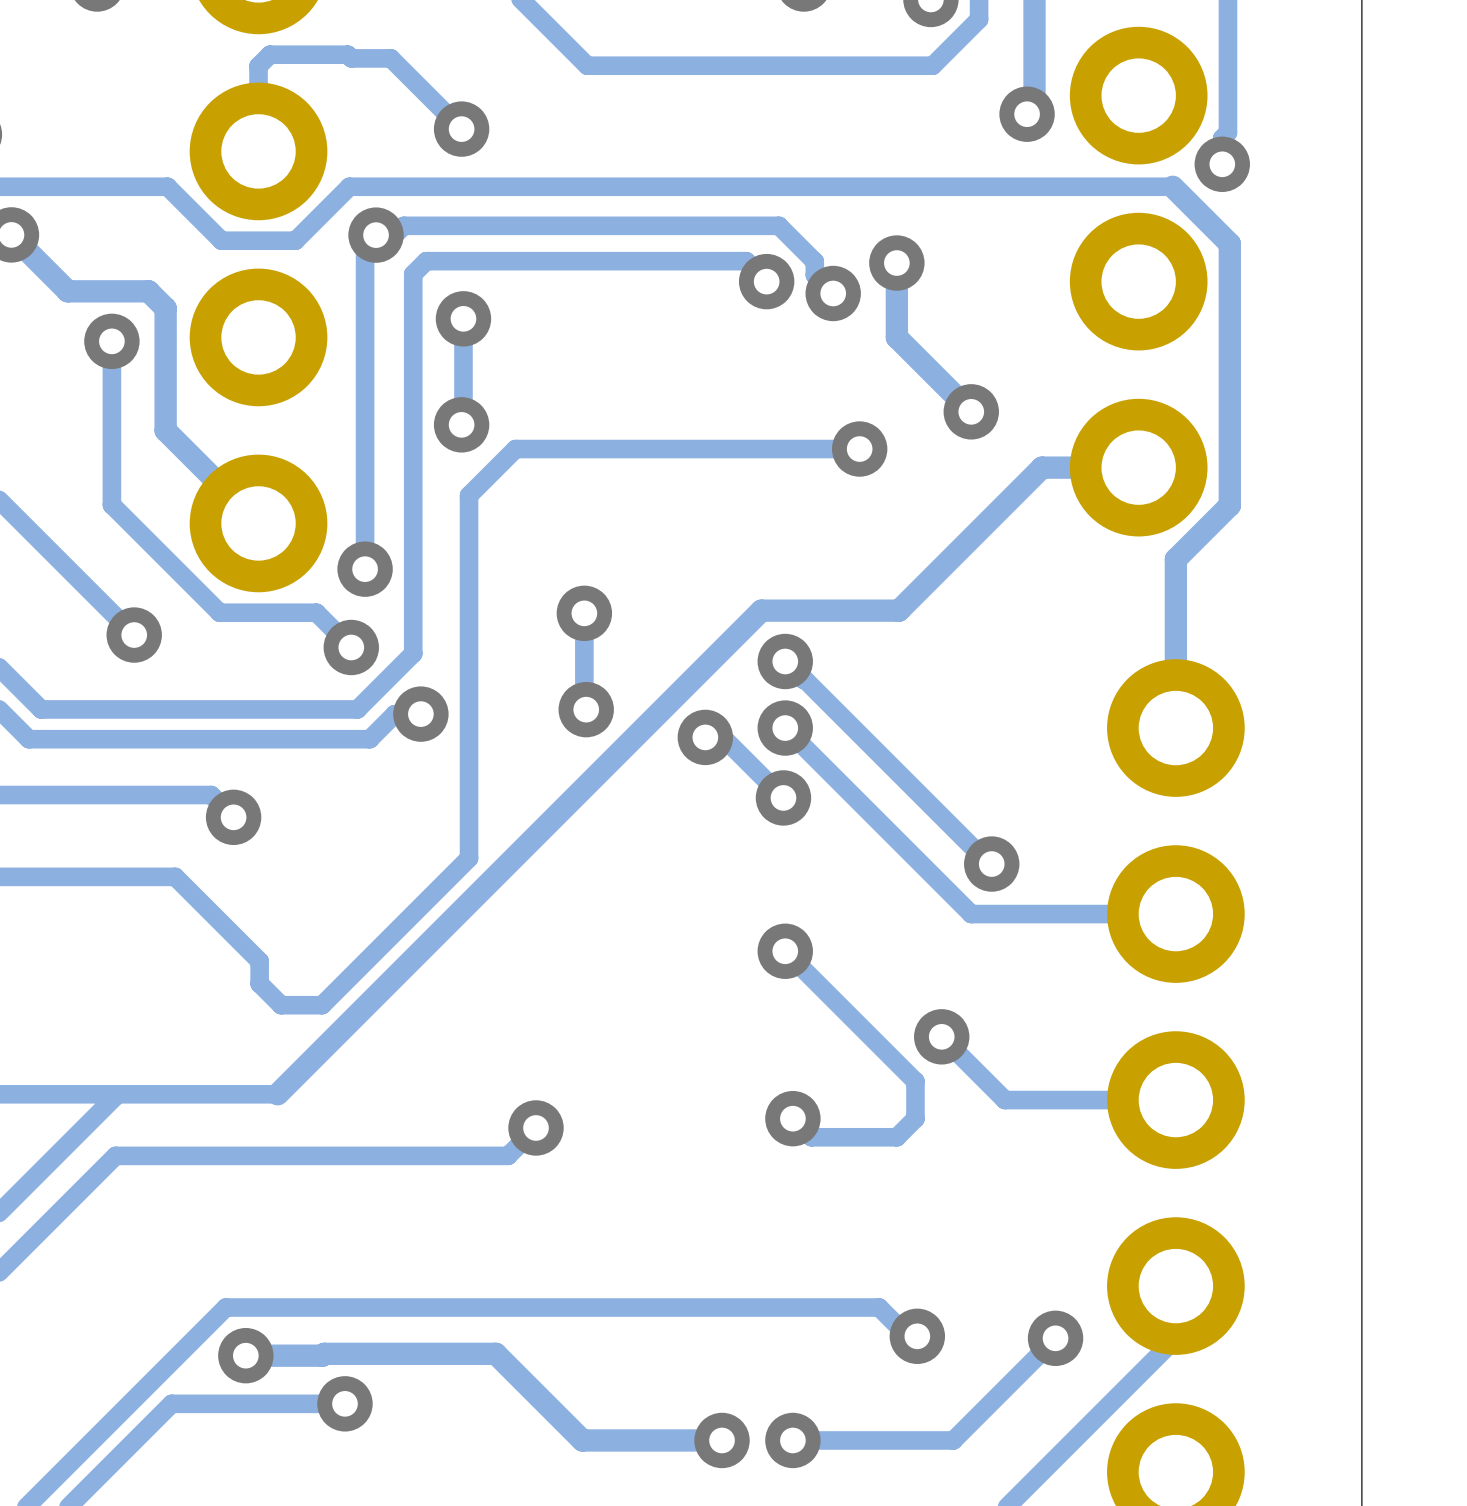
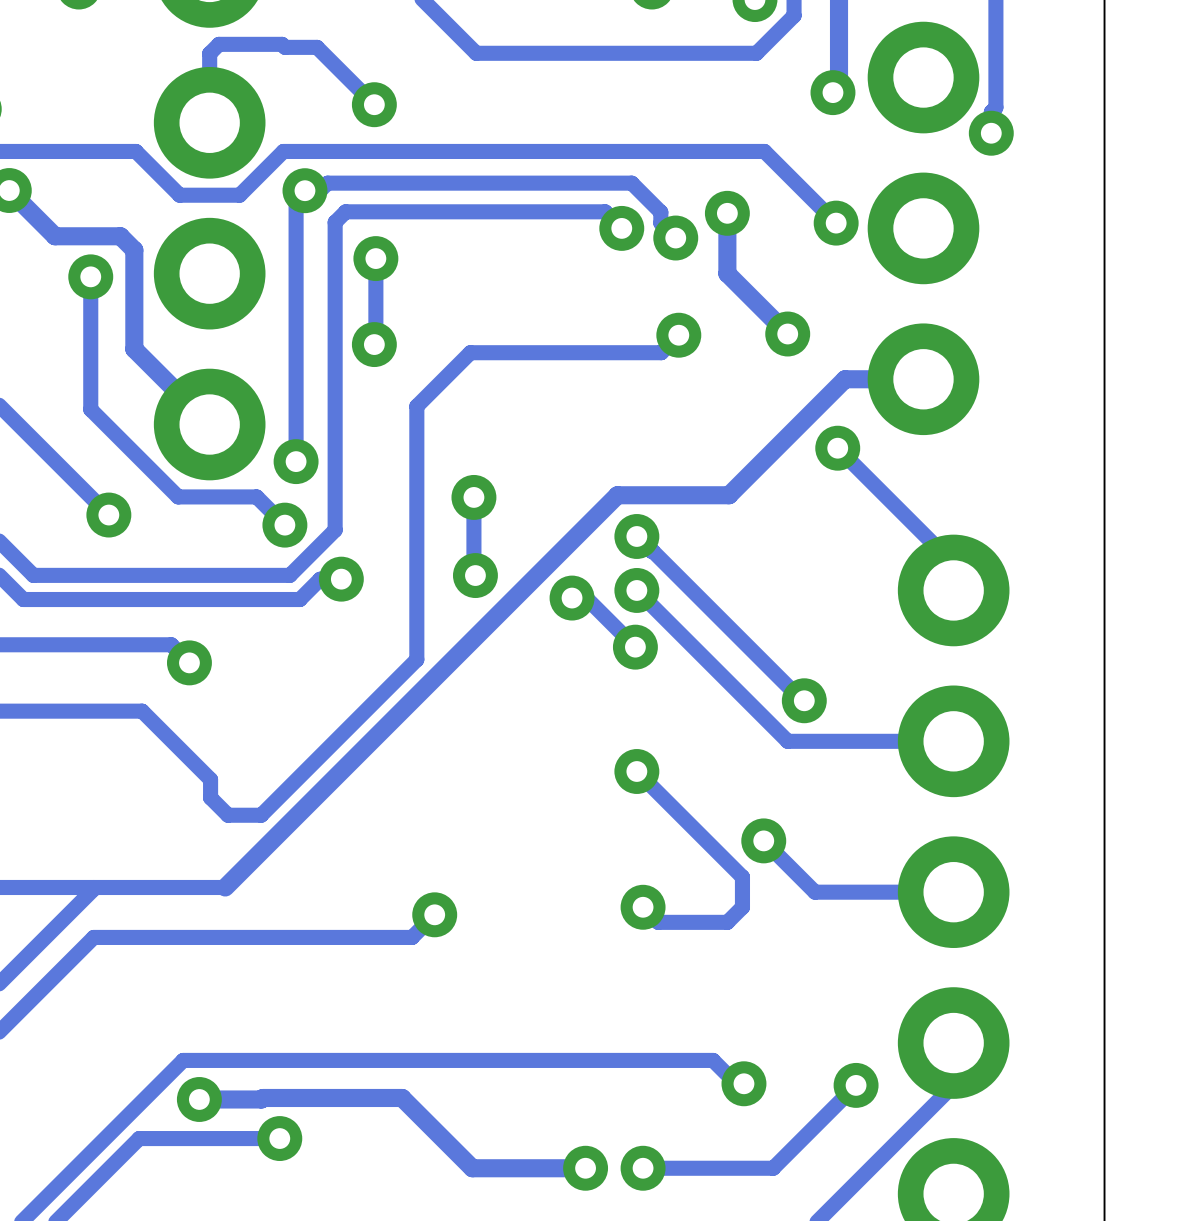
track: (942, 186) (1172, 186) (1229, 243) (1229, 505) (1175, 559) (1175, 695) -> (837, 448) (953, 564)
track: none -> (764, 151) (836, 223)
via: none -> (836, 223)
track: (859, 449) (515, 449) (469, 495) (469, 858) -> (678, 335) (661, 352) (470, 352) (416, 406) (416, 659) (380, 696)
via position: (859, 449) -> (678, 335)
via: none -> (837, 448)

